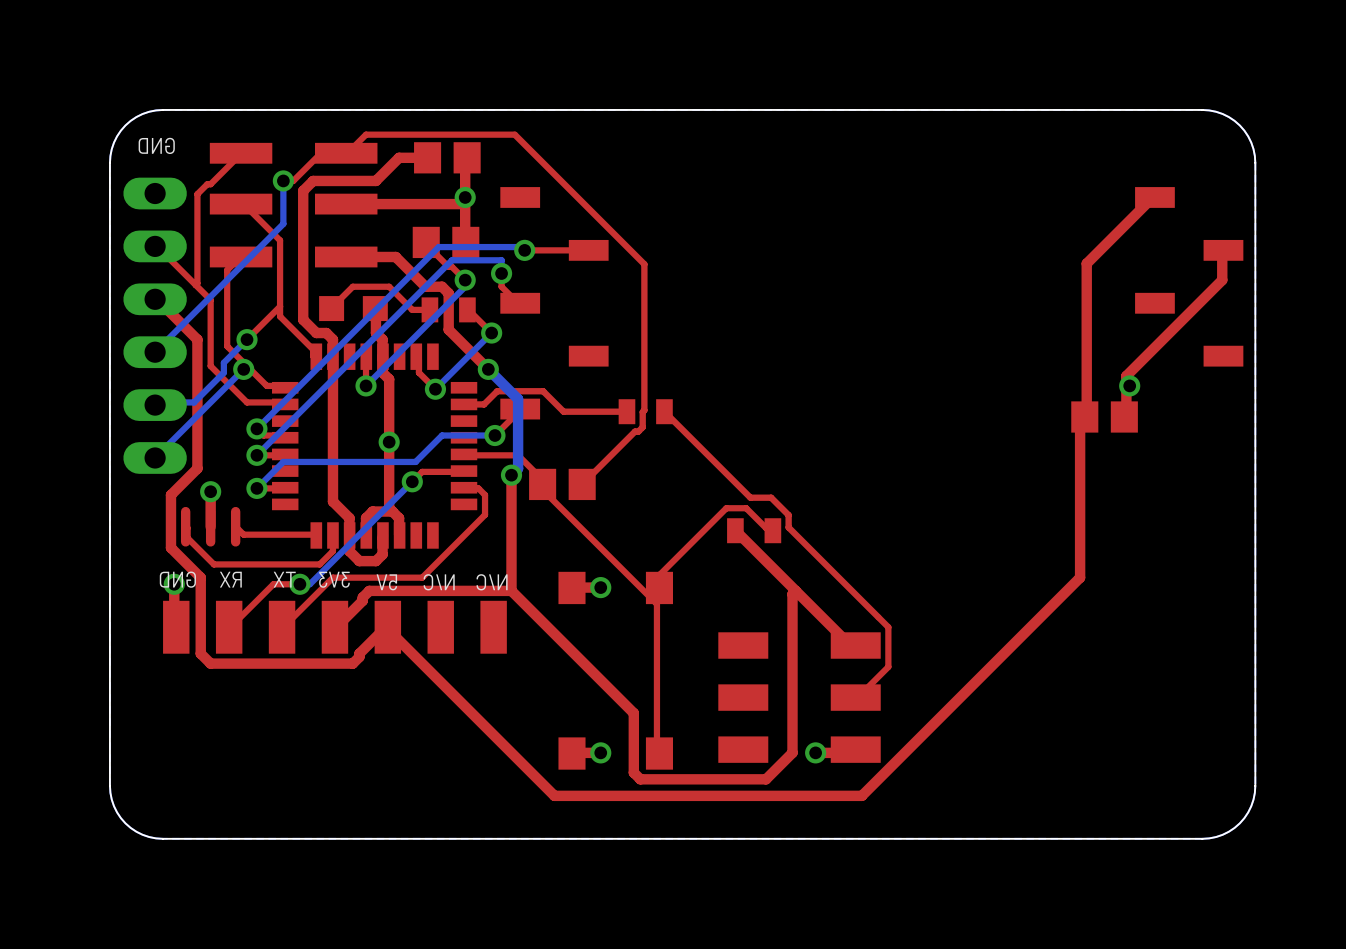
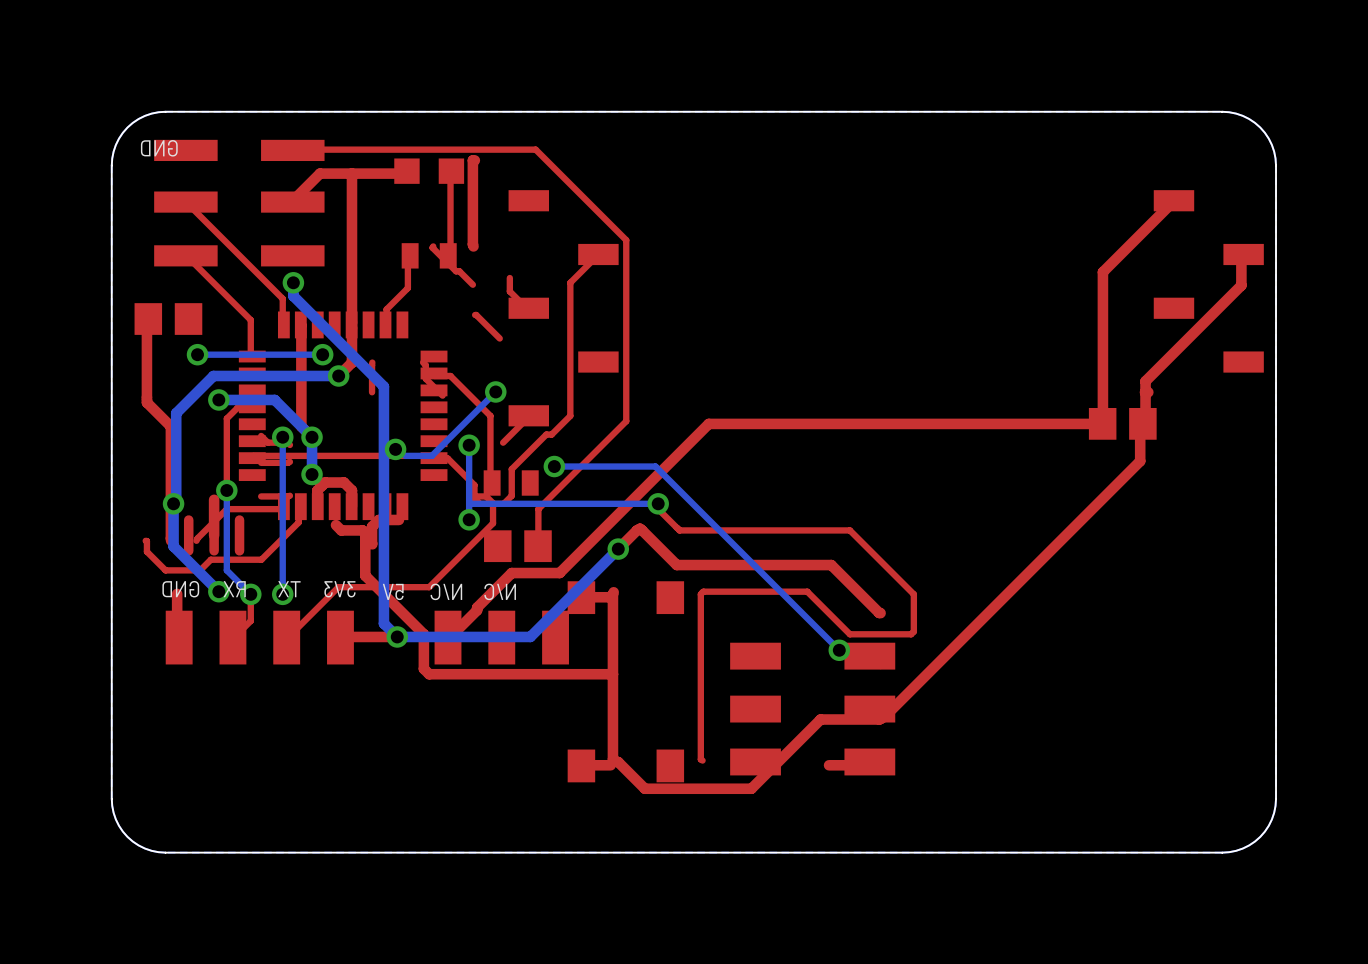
top track: none -> (292, 150) (535, 149) (626, 240) (626, 421) (538, 509) (538, 546)
top track: (241, 153) (210, 184) (207, 184) (197, 194) (197, 283) (195, 285) -> none
top track: (427, 157) (399, 157) (375, 180) (313, 180) (303, 190) (303, 319) (316, 333) (326, 333) (332, 339) (332, 501) (349, 518) (349, 551) (359, 561) (375, 561) (382, 554) (382, 535) -> none
part: (447, 157) -> none
top track: none -> (406, 171) (405, 173) (320, 173) (292, 202)
top track: none -> (451, 171) (450, 253) (448, 255)
top track: none -> (351, 173) (351, 362) (338, 375)
part footprint: [123, 177, 187, 474] -> [134, 303, 203, 335]
top track: (283, 180) (293, 180) (319, 154) (346, 154) (366, 134) (514, 134) (644, 264) (644, 410) (642, 412) (642, 427) (638, 431) (635, 431) (582, 484) (584, 485) -> none
bottom track: (283, 180) (283, 223) (155, 352) -> none
via: (283, 180) -> none
via: (465, 197) -> none
top track: (1154, 197) (1086, 263) (1086, 415) (1080, 418) (1080, 577) (861, 795) (554, 795) (387, 627) (359, 653) (359, 657) (352, 663) (210, 663) (200, 653) (200, 577) (170, 547) (170, 495) (197, 468) (197, 339) (155, 299) -> (1173, 200) (1102, 272) (1102, 423) (708, 423) (559, 573) (511, 573) (477, 607) (477, 610) (448, 637)
top track: none -> (185, 202) (282, 298) (283, 324)
top track: (241, 204) (243, 204) (280, 240) (280, 316) (313, 349) (313, 356) (316, 356) -> none
top track: (465, 204) (346, 204) -> none
part position: (293, 205) -> (239, 203)
part: (446, 242) -> none
top track: (155, 246) (210, 299) (210, 366) (247, 402) (283, 402) (285, 404) -> none
bottom track: (524, 250) (524, 247) (438, 247) (256, 428) -> none
via: (524, 250) -> none
top track: (588, 250) (524, 250) -> (598, 254) (570, 282) (570, 415) (551, 434) (546, 434) (511, 469) (511, 495) (503, 503) (479, 503) (474, 498) (474, 485) (447, 458) (434, 458)
top track: (1223, 250) (1222, 280) (1126, 376) (1126, 415) (1124, 416) -> (1243, 254) (1241, 256) (1241, 285) (1145, 381) (1145, 421) (1140, 426) (1140, 461) (884, 716) (879, 719) (820, 719) (751, 788) (644, 788) (618, 762) (613, 760) (613, 592)
top track: none -> (185, 255) (250, 320) (252, 356)
top track: none -> (410, 255) (407, 256) (407, 288) (386, 309) (385, 324)
top track: (241, 256) (227, 270) (227, 346) (266, 385) (283, 385) (285, 387) -> none
top track: (346, 256) (395, 256) (425, 286) (442, 286) (448, 293) (448, 329) (488, 369) -> none
bottom track: (501, 273) (501, 260) (451, 260) (256, 455) -> none
via: (501, 273) -> none
bottom track: none -> (293, 282) (293, 296) (383, 386) (383, 623) (397, 636) (530, 636) (618, 549)
via: none -> (293, 282)
bottom track: (465, 280) (465, 286) (366, 385) -> none
via: (465, 280) -> none
top track: (280, 306) (247, 339) -> none
top track: (331, 308) (352, 286) (389, 286) (412, 309) (429, 309) -> none
part position: (353, 308) -> (429, 171)
top track: (375, 308) (375, 333) (382, 339) (382, 372) (389, 379) (389, 508) (399, 518) (399, 535) -> none
part position: (448, 309) -> (429, 255)
top track: none -> (148, 319) (146, 402) (170, 426) (171, 540)
top track: none -> (300, 324) (301, 426) (312, 437)
bottom track: (491, 333) (435, 389) -> none
via: (491, 333) -> none
bottom track: (247, 339) (223, 362) (223, 372) (194, 402) (157, 402) (155, 405) -> none
via: (247, 339) -> none
via: none -> (197, 354)
bottom track: none -> (322, 354) (197, 354)
via: none -> (322, 354)
top track: none -> (434, 373) (434, 375) (450, 375) (490, 415) (490, 482) (492, 483)
bottom track: (243, 369) (155, 457) -> none
via: (243, 369) -> none
bottom track: none -> (338, 375) (213, 375) (176, 413) (176, 501) (173, 503) (173, 546) (218, 591)
via: none -> (338, 375)
bottom track: (488, 369) (518, 399) (518, 468) (511, 475) -> none
via position: (488, 369) -> (495, 391)
via: (366, 385) -> none
bottom track: none -> (495, 391) (431, 455) (405, 455)
via: (1129, 385) -> none
via: (435, 389) -> none
bottom track: none -> (218, 399) (274, 399) (312, 437) (312, 474)
via: none -> (218, 399)
top track: none -> (252, 407) (237, 407) (226, 418) (226, 490)
top track: (464, 404) (484, 404) (497, 391) (543, 391) (563, 411) (626, 411) -> none
part: (645, 411) -> none
top track: (664, 411) (750, 497) (771, 497) (788, 515) (788, 527) (888, 627) (888, 666) (855, 697) -> none
via: (256, 428) -> none
bottom track: none -> (282, 437) (282, 594)
via: none -> (282, 437)
via: none -> (312, 437)
bottom track: (494, 435) (442, 435) (415, 461) (283, 461) (256, 488) -> none
via: (494, 435) -> none
bottom track: none -> (469, 445) (469, 519)
via: none -> (469, 445)
part position: (374, 446) -> (343, 415)
top track: none -> (405, 455) (253, 455) (252, 458)
top track: (464, 454) (518, 455) (544, 481) (542, 484) (544, 485) (544, 491) (656, 604) -> none
via: (256, 455) -> none
bottom track: none -> (554, 466) (655, 466) (839, 650)
via: none -> (554, 466)
via: none -> (312, 474)
top track: (464, 471) (422, 471) (412, 481) -> none
part: none -> (511, 483)
top track: (511, 475) (511, 590) -> none
via: (511, 475) -> none
bottom track: (412, 481) (309, 584) (299, 584) -> none
via: (412, 481) -> none
bottom track: none -> (226, 490) (226, 570) (250, 594)
part position: (562, 484) -> (517, 546)
via: (256, 488) -> none
via position: (210, 491) -> (226, 490)
via: none -> (173, 503)
top track: none -> (658, 503) (658, 509) (679, 530) (849, 530) (913, 594) (913, 631) (911, 634) (849, 634) (807, 591) (702, 592) (700, 594) (700, 759) (702, 760)
bottom track: none -> (658, 503) (469, 503)
via: none -> (658, 503)
top track: none -> (283, 506) (282, 509) (226, 509) (196, 540)
top track: none -> (300, 506) (298, 509) (298, 522) (261, 559) (210, 559) (200, 570) (165, 570) (146, 551) (145, 540)
top track: none -> (351, 506) (351, 490) (343, 482) (325, 482) (317, 490) (317, 506)
via: none -> (469, 519)
top track: none -> (336, 525) (341, 530) (362, 530) (365, 533) (365, 575) (423, 634) (423, 668) (429, 674) (612, 674)
top track: (185, 526) (187, 528) (187, 537) (213, 564) (319, 564) (332, 551) (332, 535) -> none
top track: (235, 526) (243, 534) (316, 535) -> none
top track: (735, 530) (848, 643) (855, 643) (855, 645) -> none
part: (754, 530) -> none
top track: (772, 530) (772, 528) (766, 528) (746, 508) (726, 508) (660, 574) (660, 587) (656, 590) (656, 752) (659, 753) -> none
top track: none -> (618, 549) (639, 528) (676, 565) (831, 565) (880, 613)
via: none -> (218, 591)
via: (174, 584) -> none
via: none -> (250, 594)
top track: (299, 584) (273, 584) (229, 627) -> (250, 594) (250, 620) (232, 637)
via position: (299, 584) -> (282, 594)
via position: (600, 587) -> (618, 549)
top track: (511, 590) (369, 590) (362, 597) (362, 600) (334, 627) -> (397, 636) (340, 637)
top track: (795, 590) (792, 594) (792, 752) (766, 779) (640, 779) (633, 772) (633, 713) (511, 590) -> none
via: none -> (397, 636)
part position: (440, 627) -> (501, 637)
via: (600, 752) -> none
via position: (815, 752) -> (839, 650)

